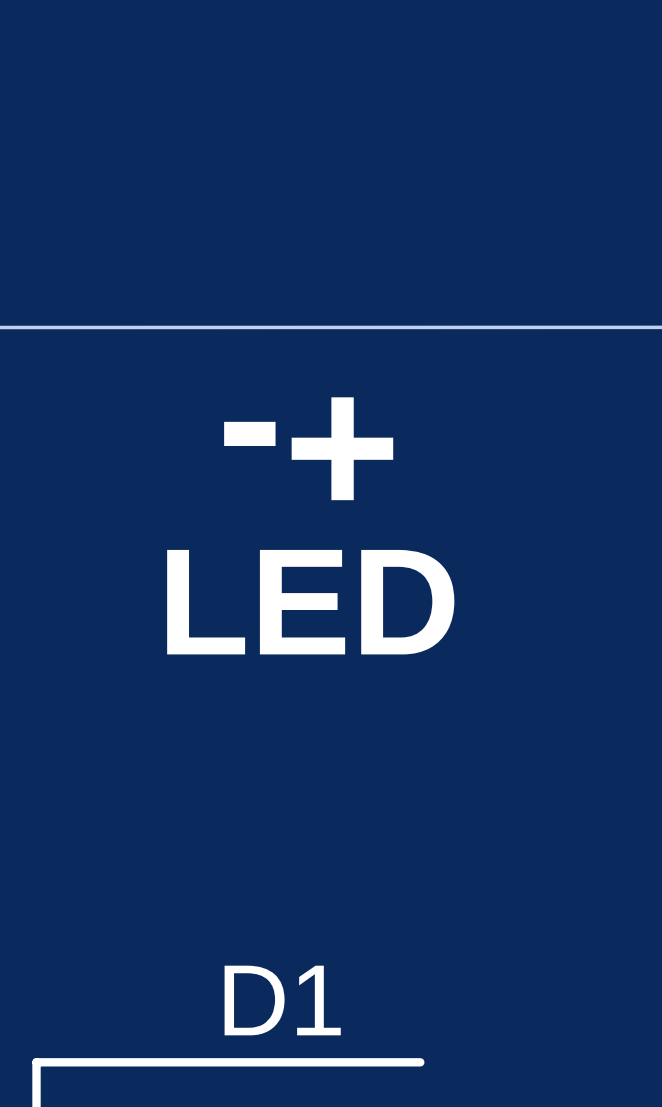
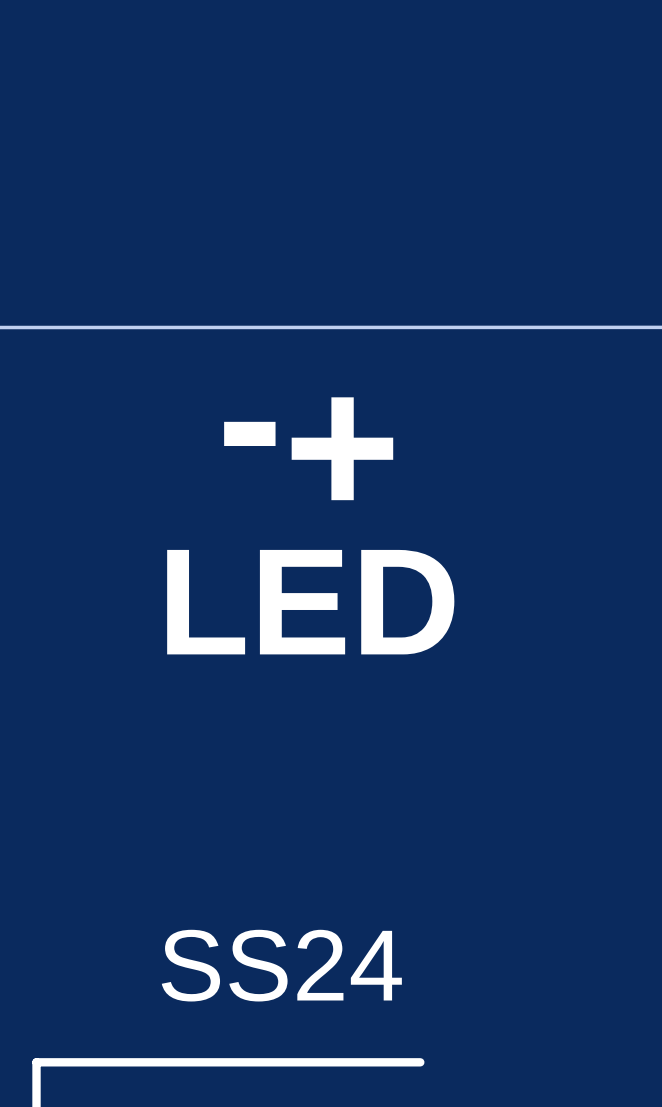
D1 value: none -> SS24 (281, 965)
D1 name: D1 (282, 1000) -> none

